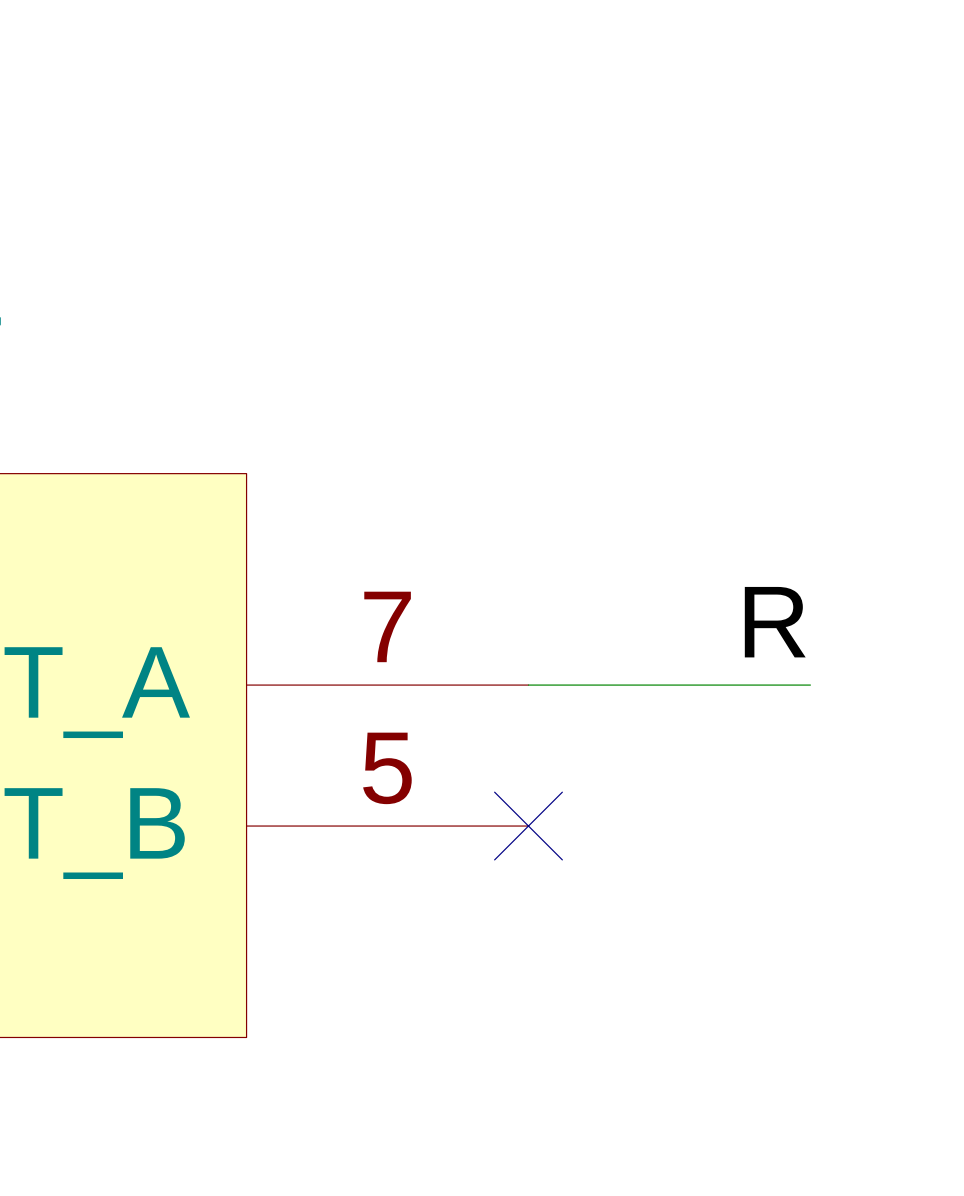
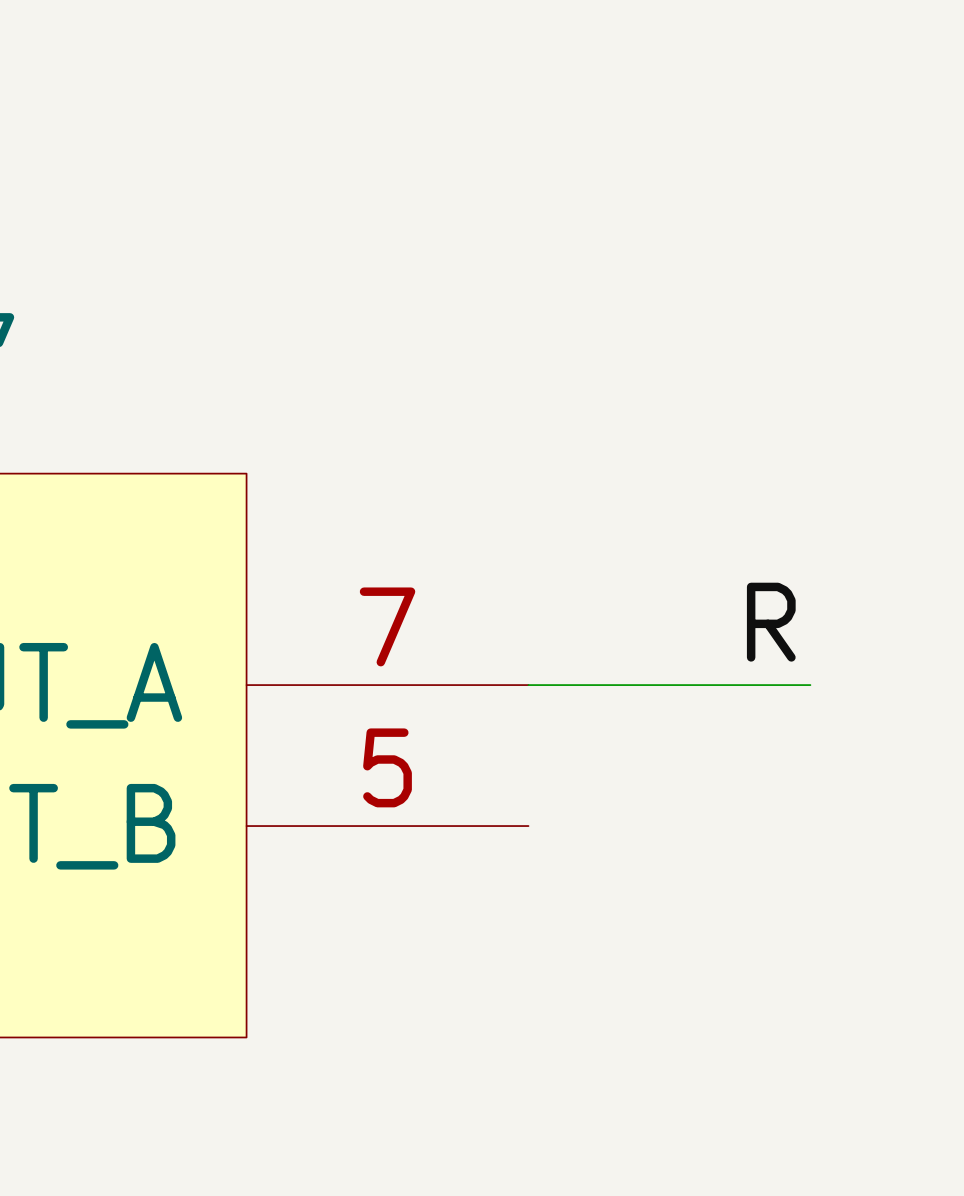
no-connect mark: (528, 826) -> none

